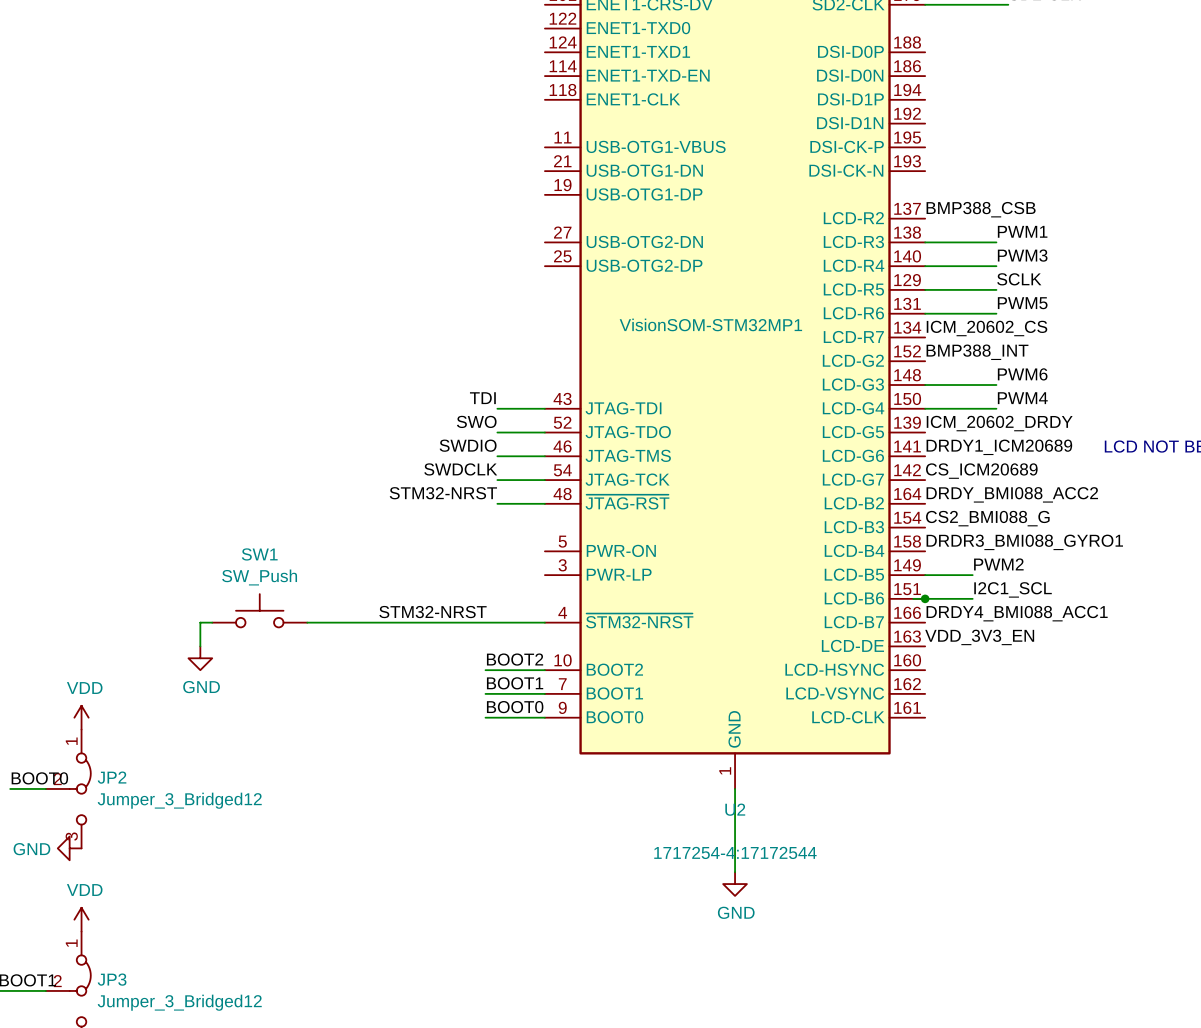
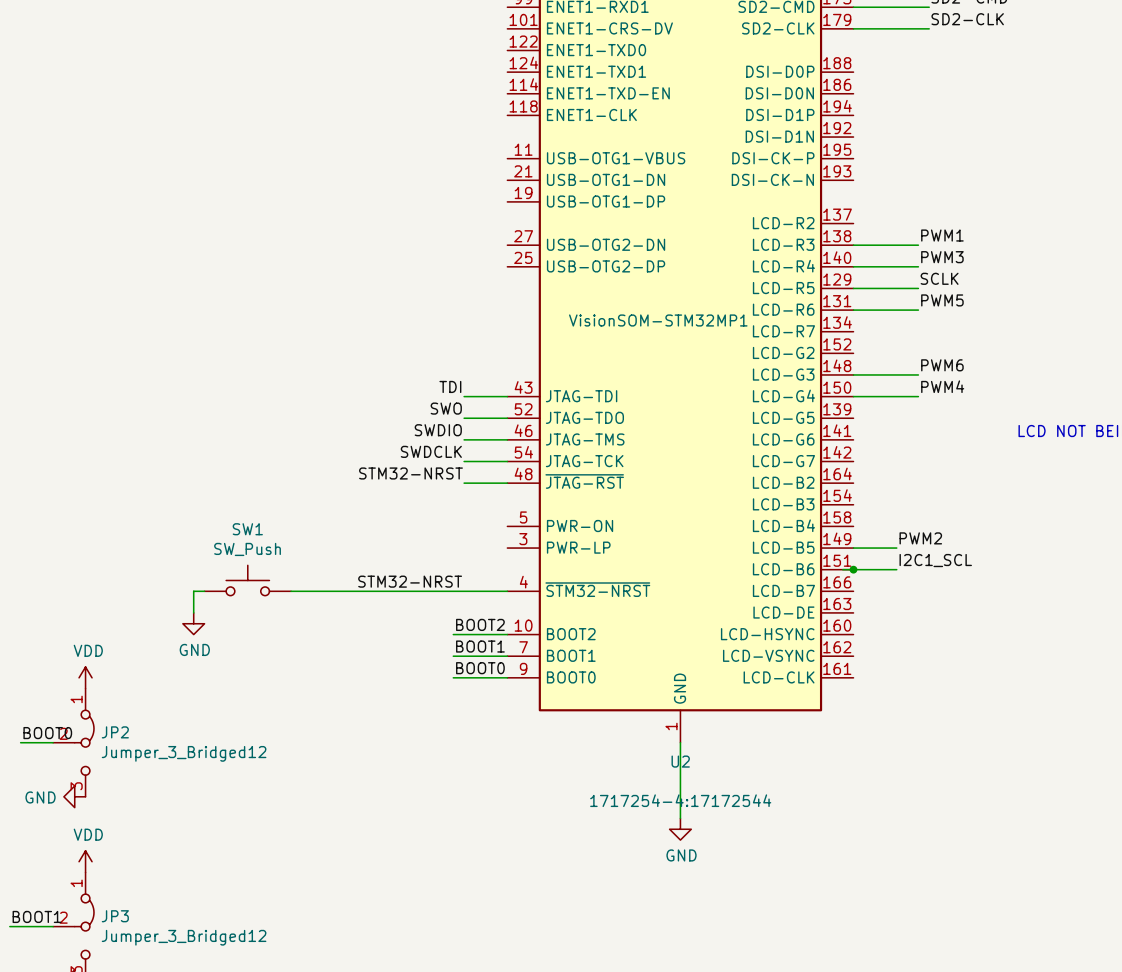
label: BMP388_CSB (981, 209) -> none
label: ICM_20602_CS (986, 328) -> none
label: BMP388_INT (977, 352) -> none
label: ICM_20602_DRDY (999, 423) -> none
label: DRDY1_ICM20689 (999, 447) -> none
label: CS_ICM20689 (981, 471) -> none
label: DRDY_BMI088_ACC2 (1012, 494) -> none
label: CS2_BMI088_G (987, 518) -> none
label: DRDR3_BMI088_GYRO1 (1024, 542) -> none
label: DRDY4_BMI088_ACC1 (1017, 613) -> none
label: VDD_3V3_EN (979, 637) -> none

